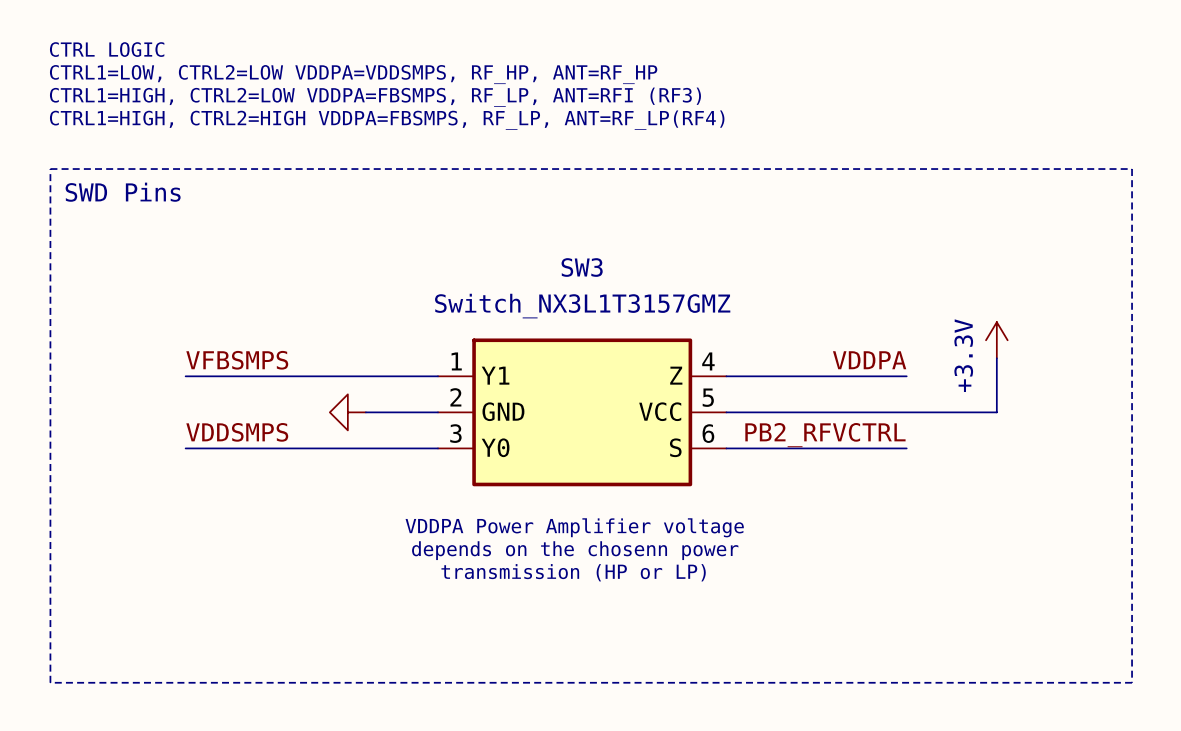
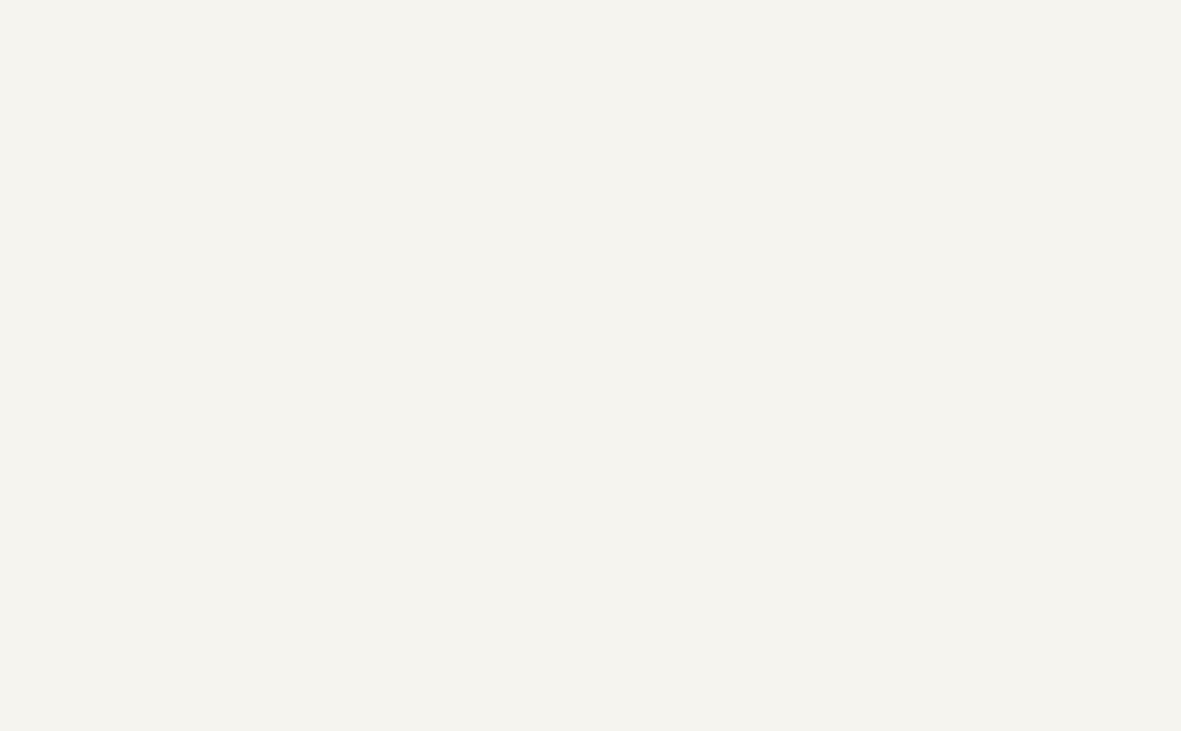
text: CTRL LOGIC (107, 49) -> none
text: CTRL1=LOW, CTRL2=LOW VDDPA=VDDSMPS, RF_HP, ANT=RF_HP (353, 74) -> none
text: CTRL1=HIGH, CTRL2=LOW VDDPA=FBSMPS, RF_LP, ANT=RFI (RF3) (375, 97) -> none
text: CTRL1=HIGH, CTRL2=HIGH VDDPA=FBSMPS, RF_LP, ANT=RF_LP(RF4) (387, 120) -> none
line: (50, 169) (1132, 169) (1132, 682) (50, 682) (50, 169) -> none
text: SWD Pins (123, 192) -> none
power symbol: +3.3V (996, 340) -> none
wire: (996, 358) (996, 412) (726, 412) -> none
label: VFBSMPS (237, 360) -> none
label: VDDPA (869, 360) -> none
wire: (185, 376) (438, 376) -> none
wire: (726, 376) (906, 376) -> none
power symbol: (347, 412) -> none
wire: (365, 412) (438, 412) -> none
SW3: Switch_NX3L1T3157GMZ (582, 412) -> none
label: VDDSMPS (237, 432) -> none
label: PB2_RFVCTRL (825, 435) -> none
wire: (185, 448) (438, 448) -> none
wire: (726, 448) (906, 448) -> none
text: VDDPA Power Amplifier voltage (574, 527) -> none
text: depends on the chosenn power (575, 550) -> none
text: transmission (HP or LP) (573, 572) -> none

